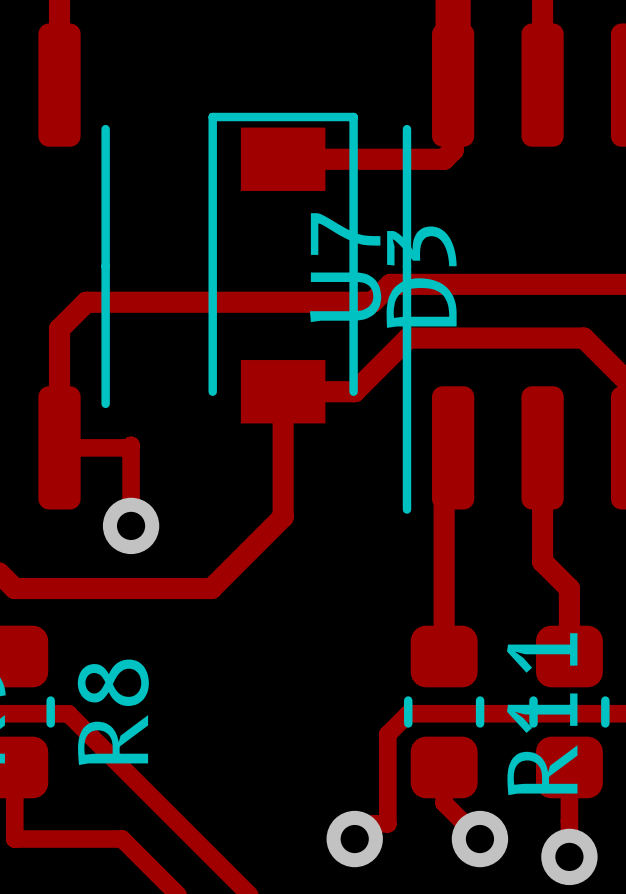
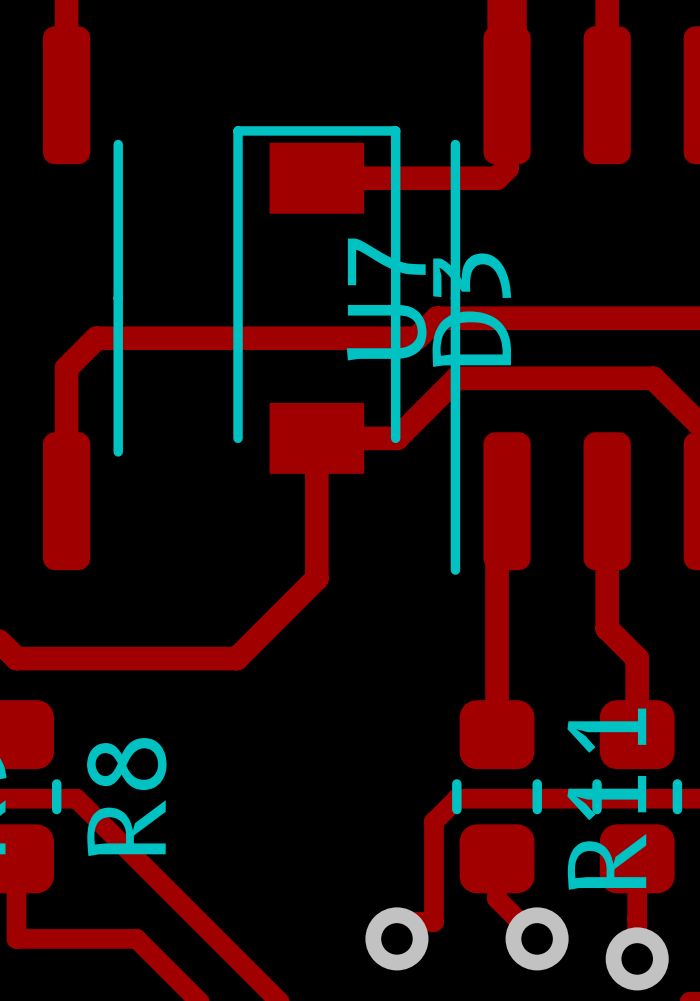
track: (59, 447) (128, 447) (131, 445) (131, 525) -> none
via: (131, 525) -> none

